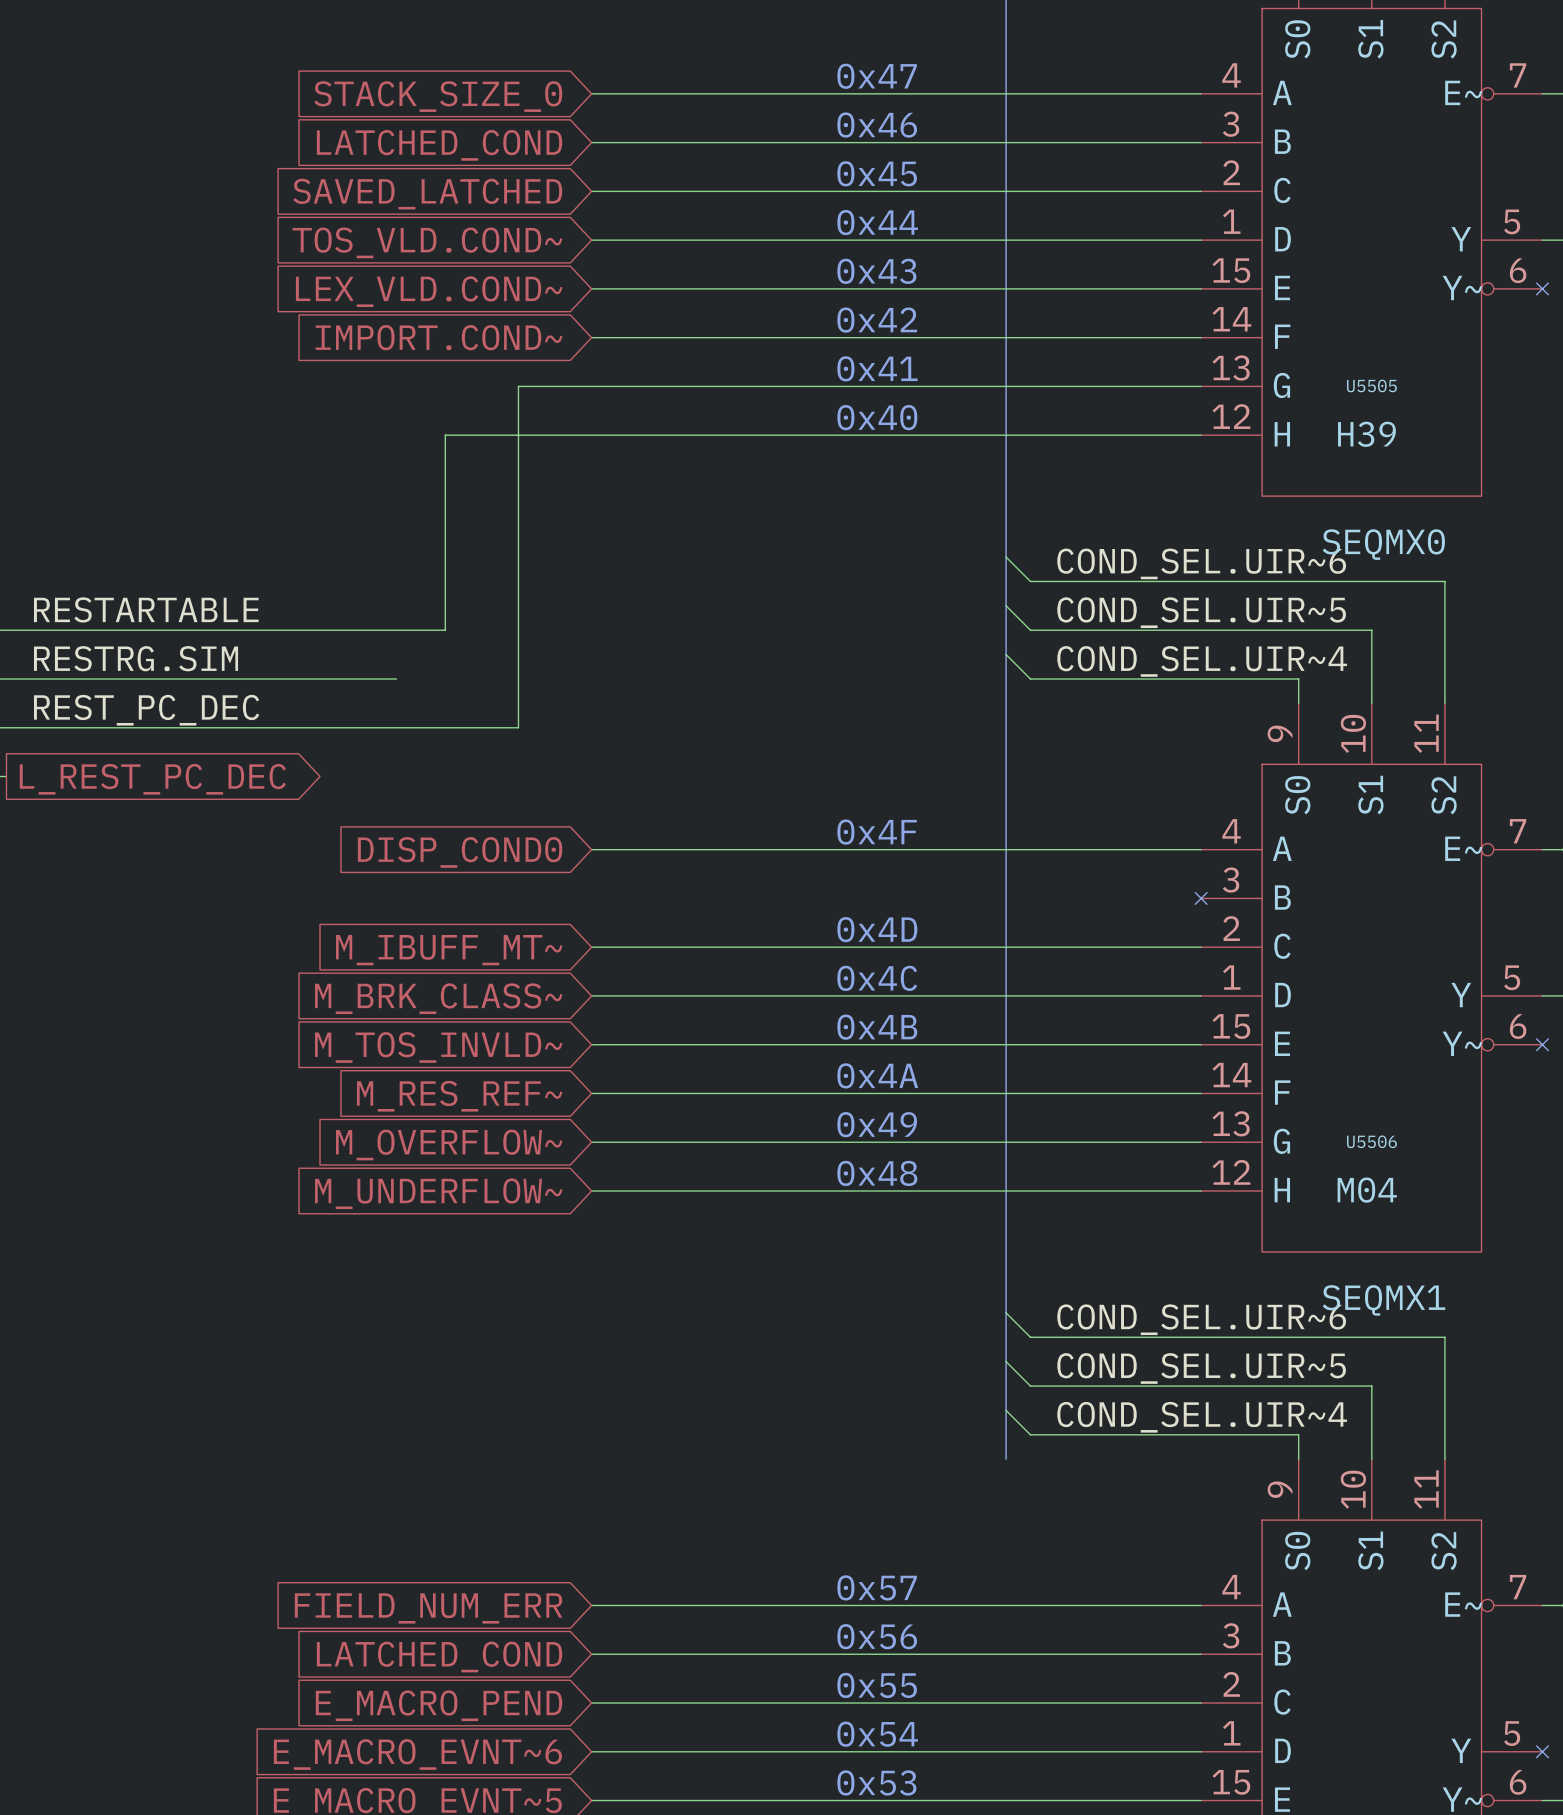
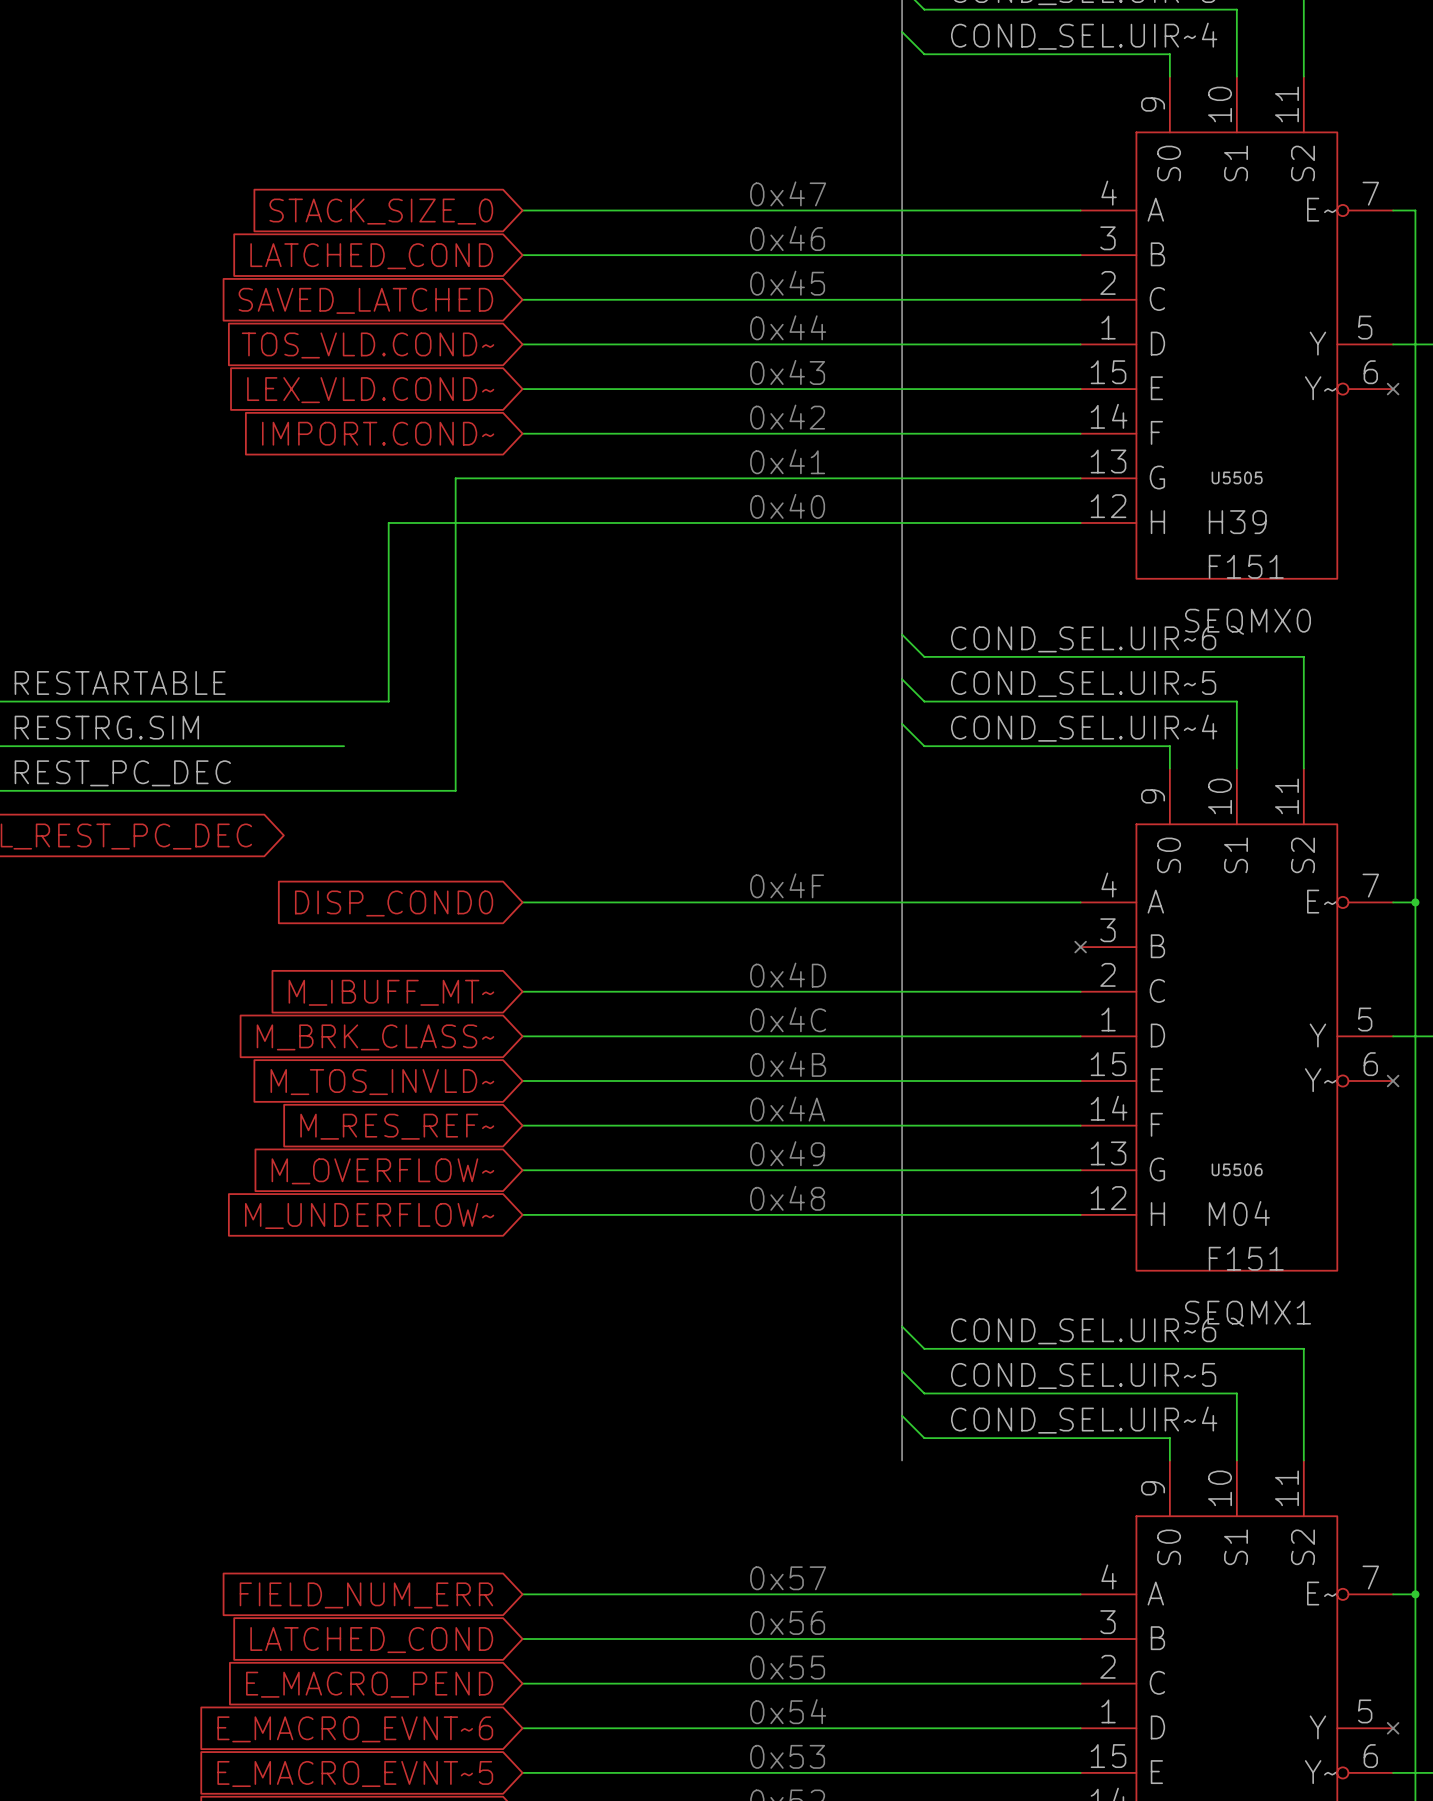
U5505 value: none -> F151 (1246, 566)
U5506 value: none -> F151 (1246, 1258)

